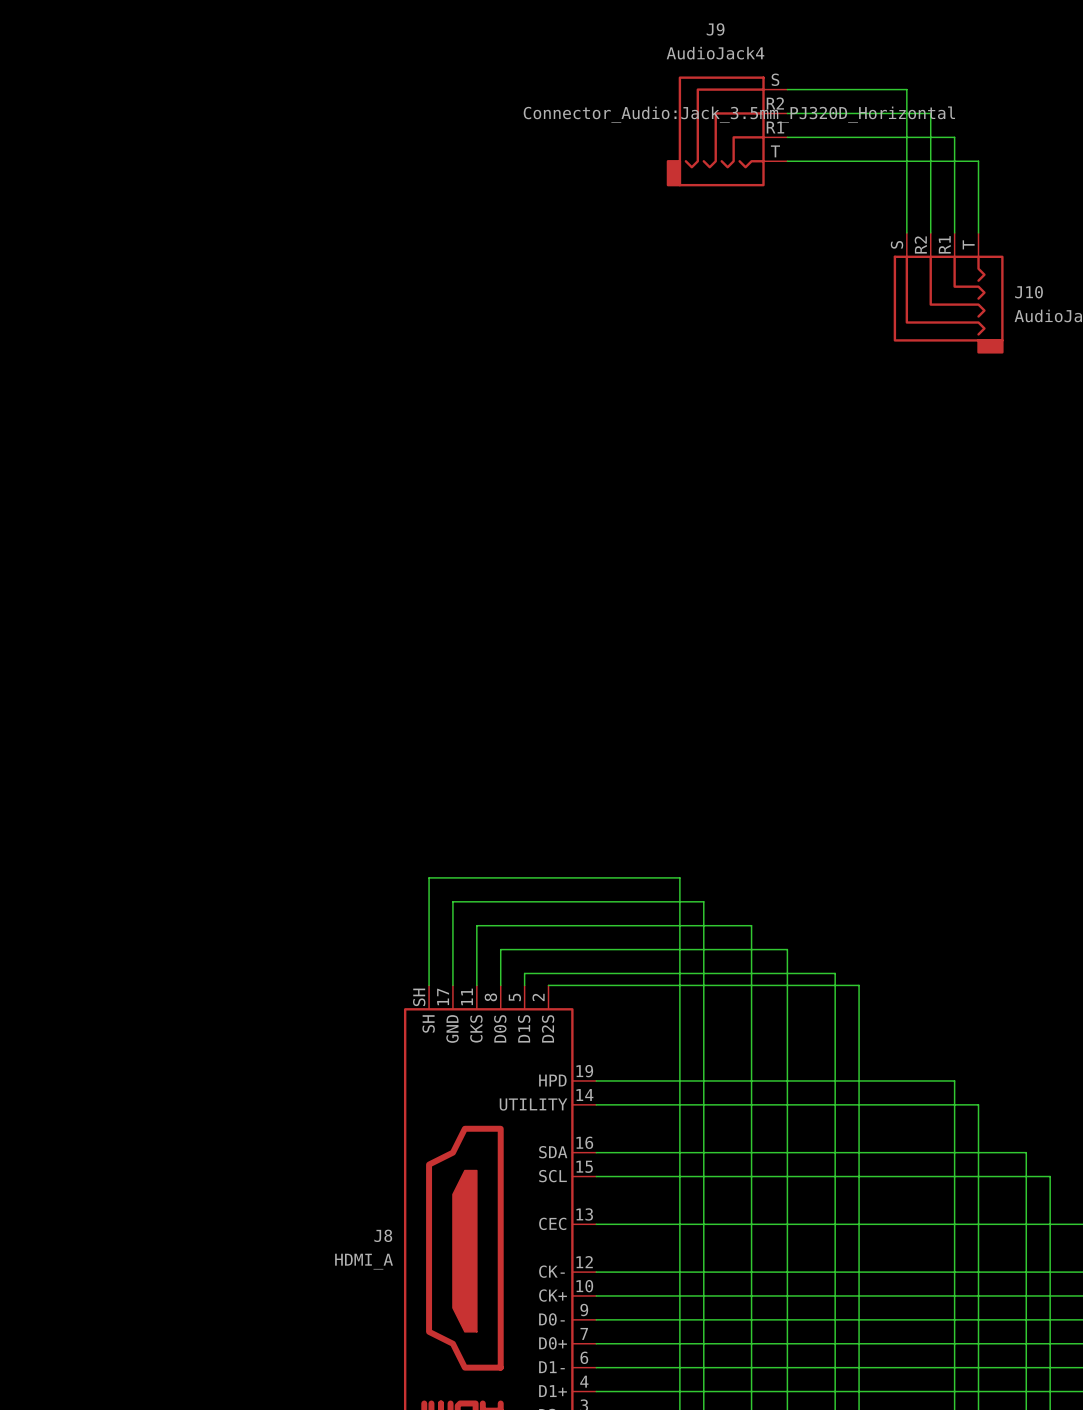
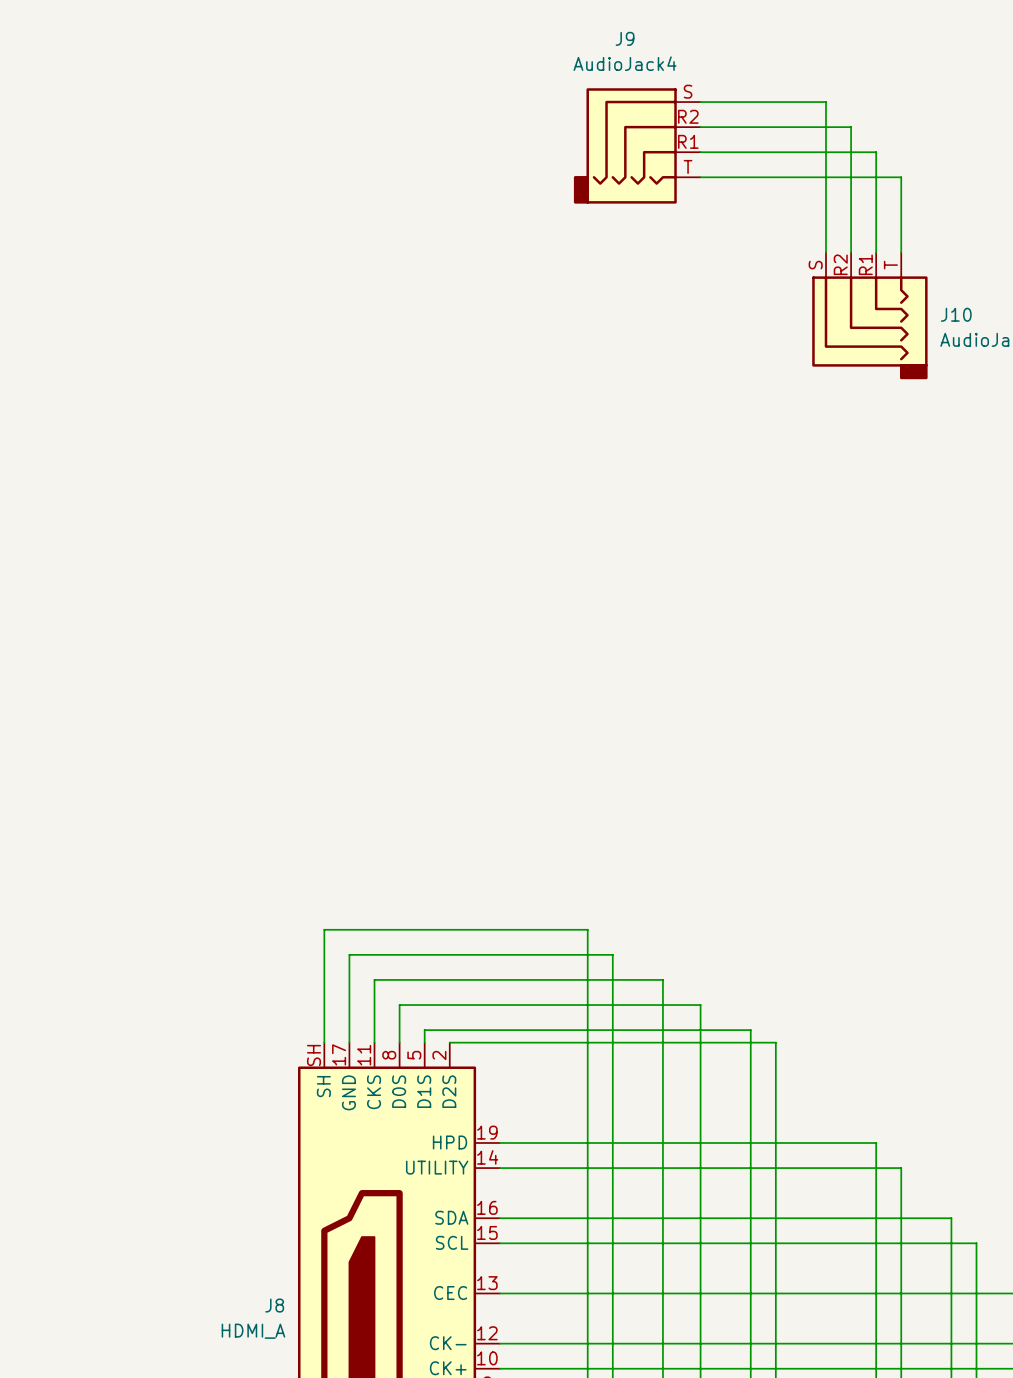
J9 text: Connector_Audio:Jack_3.5mm_PJ320D_Horizontal (739, 114) -> none

